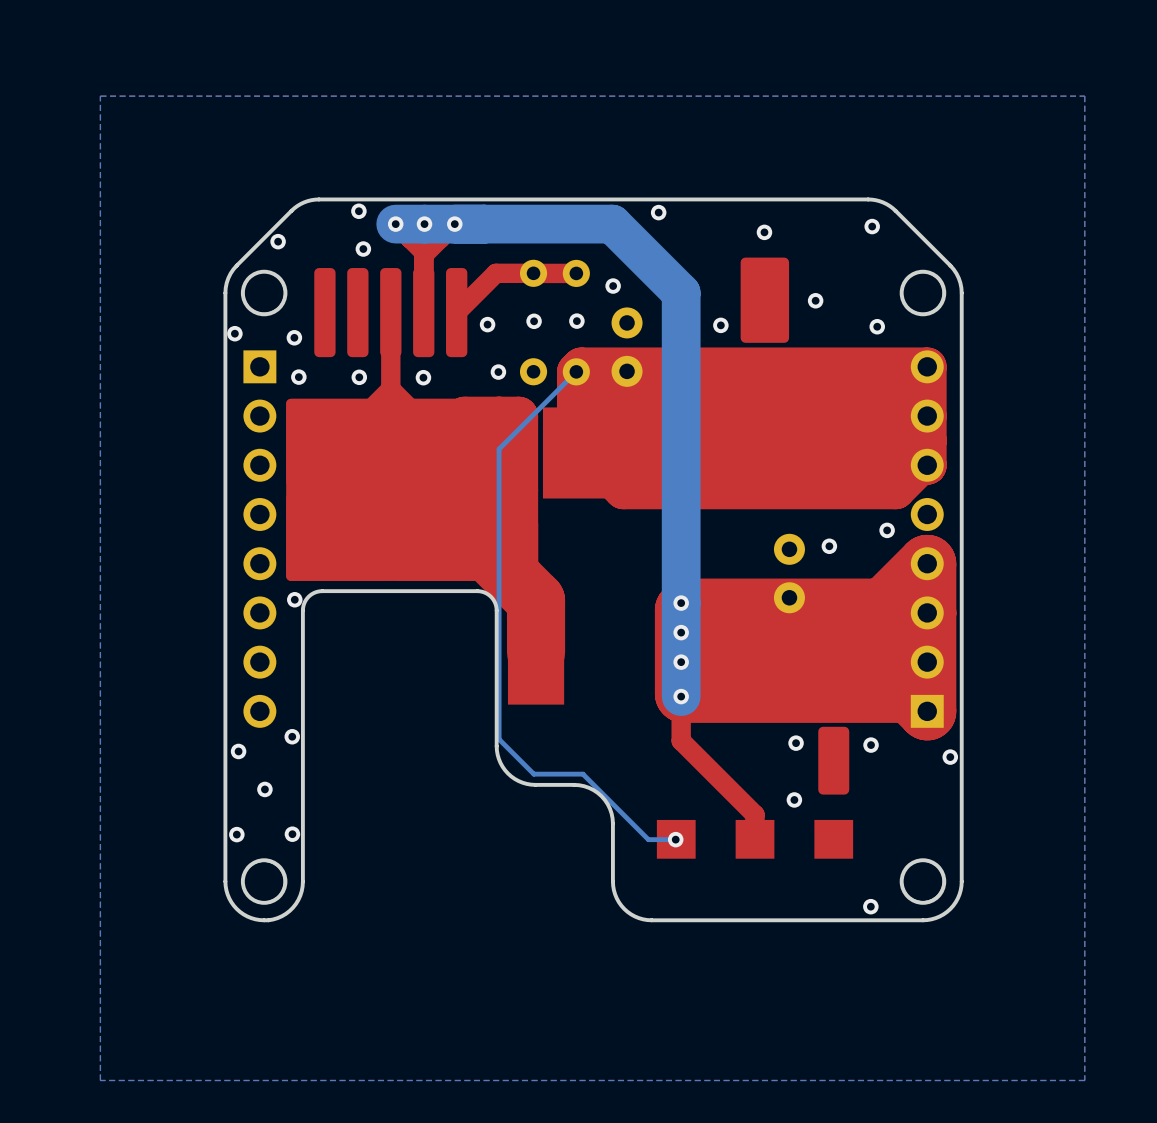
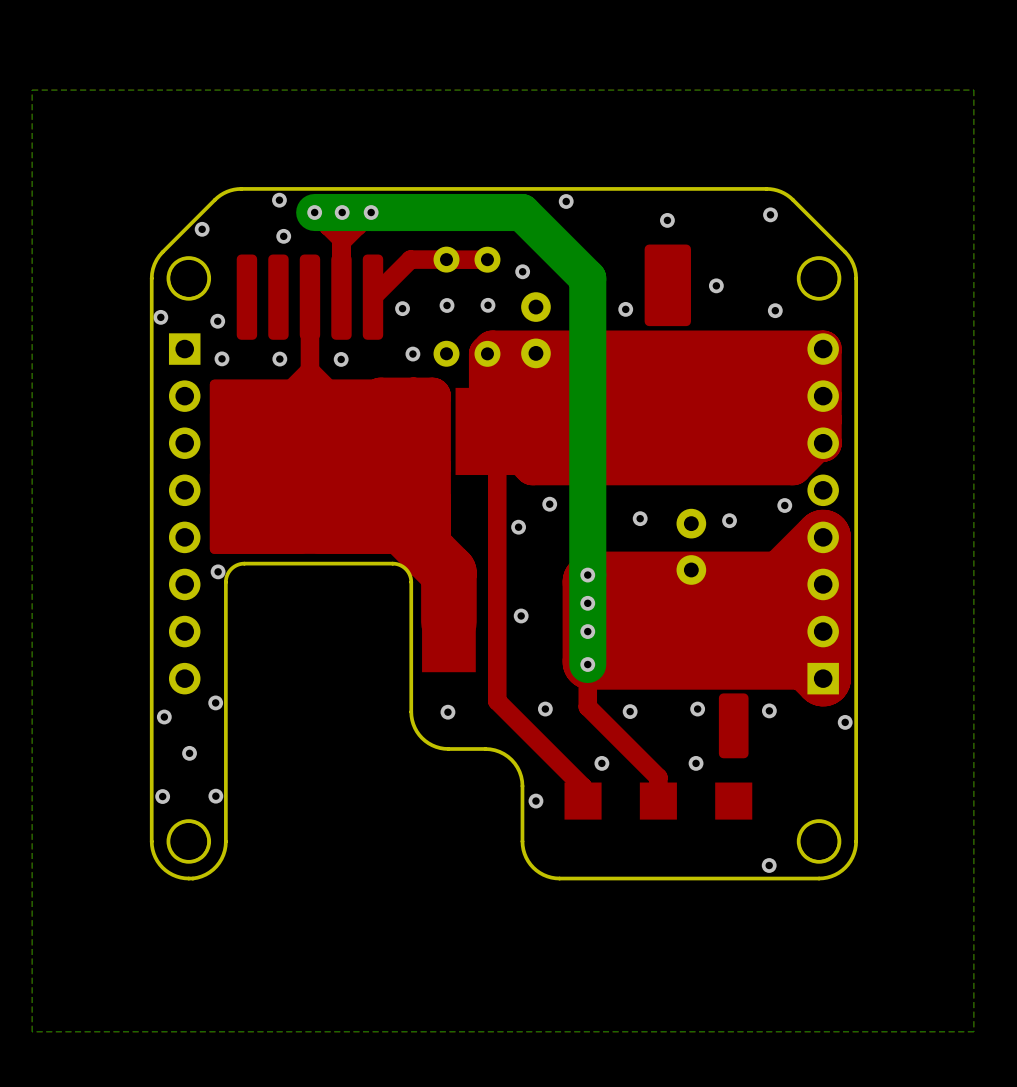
bottom track: (576, 371) (499, 449) (499, 739) (533, 774) (582, 774) (648, 839) (675, 839) -> none
top track: none -> (497, 431) (497, 701) (583, 786) (583, 801)
via: none -> (549, 504)
via: none -> (640, 518)
via: none -> (518, 527)
via: none -> (521, 615)
via: none -> (545, 709)
via: none -> (630, 711)
via: none -> (447, 712)
via: none -> (601, 763)
via: none -> (535, 801)
via: (675, 839) -> none

